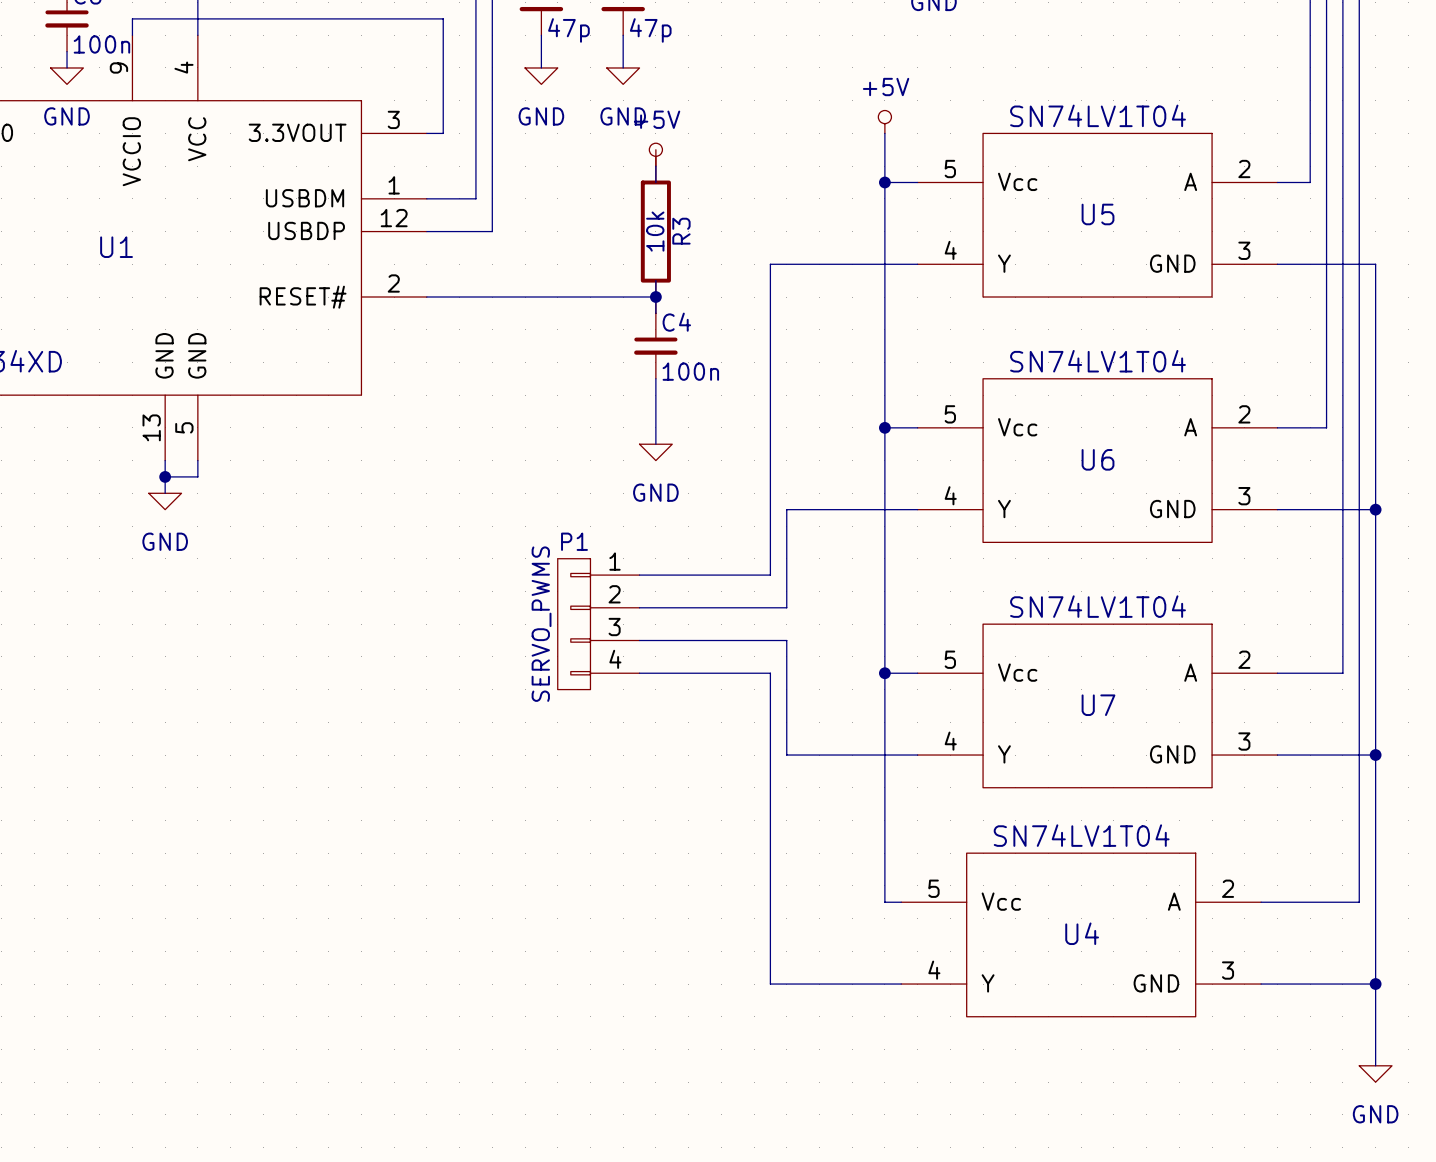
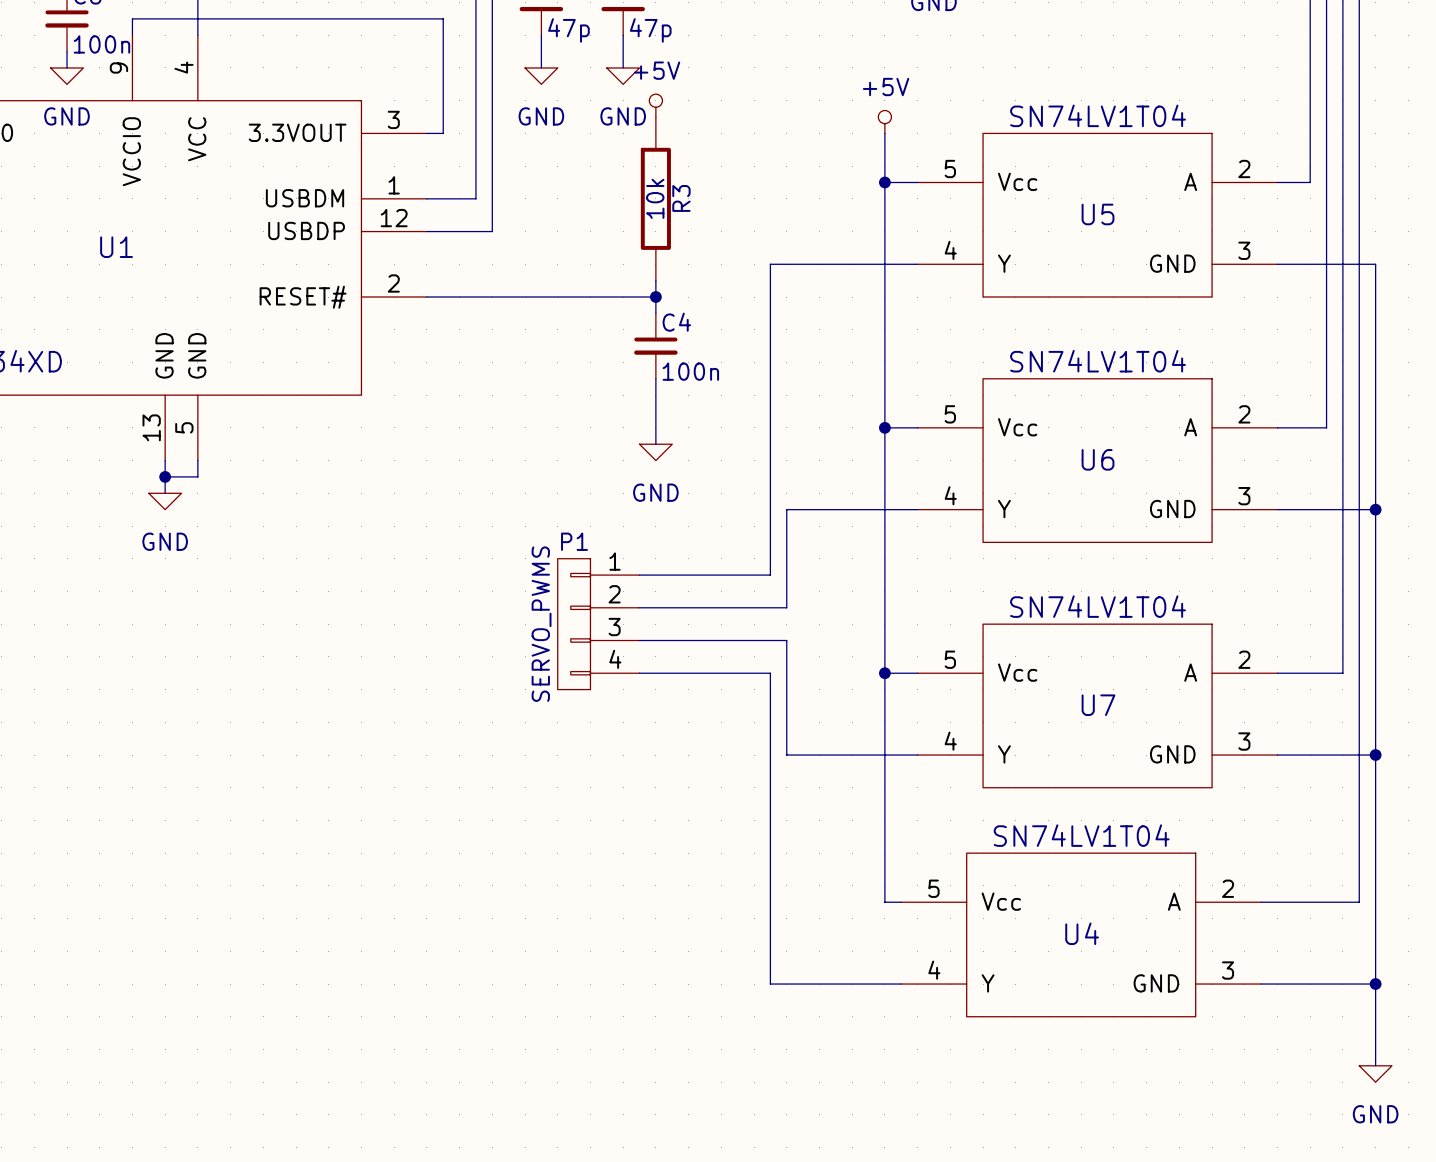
power symbol position: +5V (655, 154) -> +5V (655, 105)
wire: (655, 166) (655, 182) -> none
R3 position: (655, 231) -> (655, 198)

